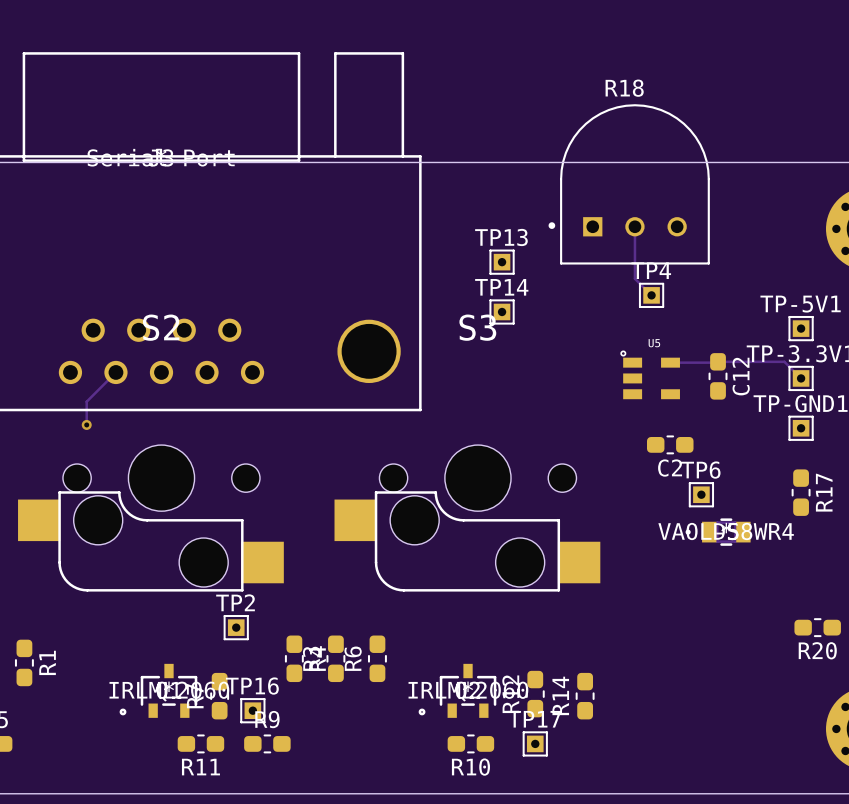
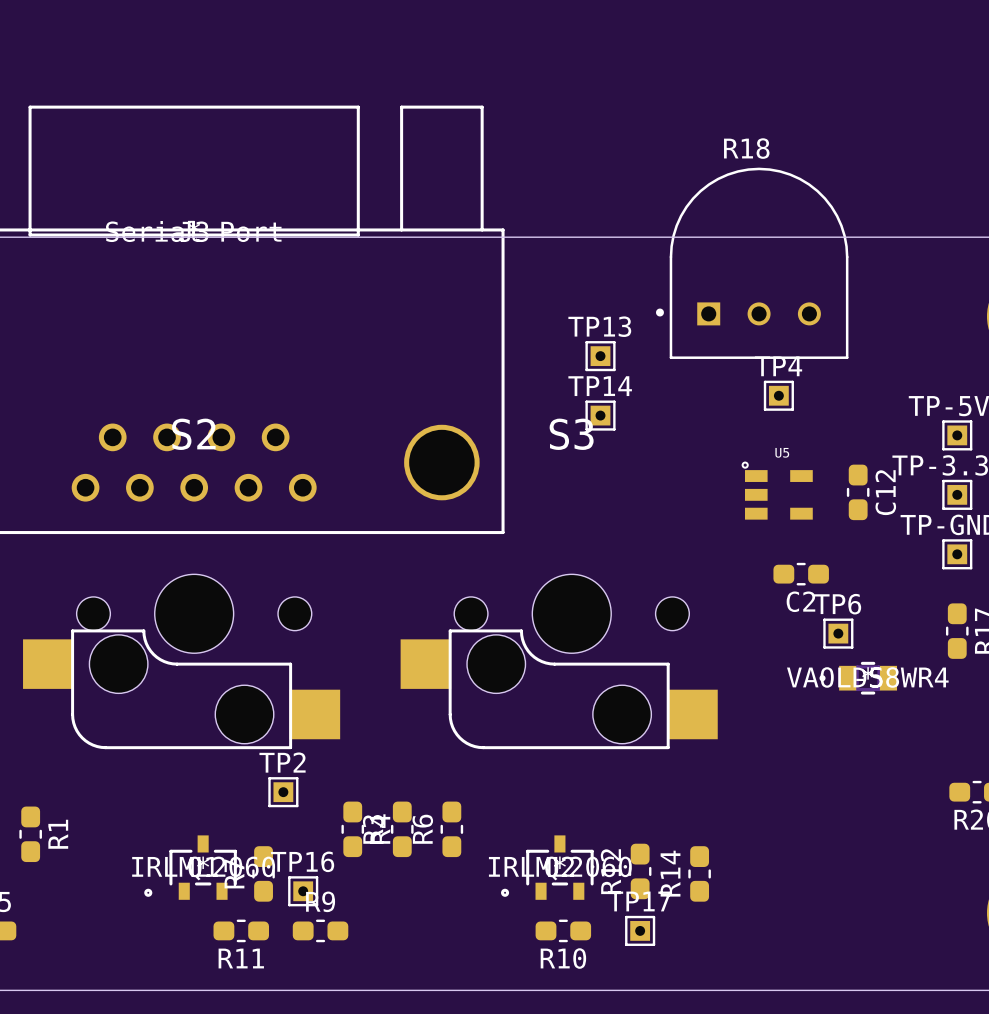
track: (634, 226) (634, 278) (651, 295) -> none
track: (670, 362) (784, 361) (801, 378) -> none
track: (115, 372) (86, 401) (86, 424) -> none
via: (86, 424) -> none

